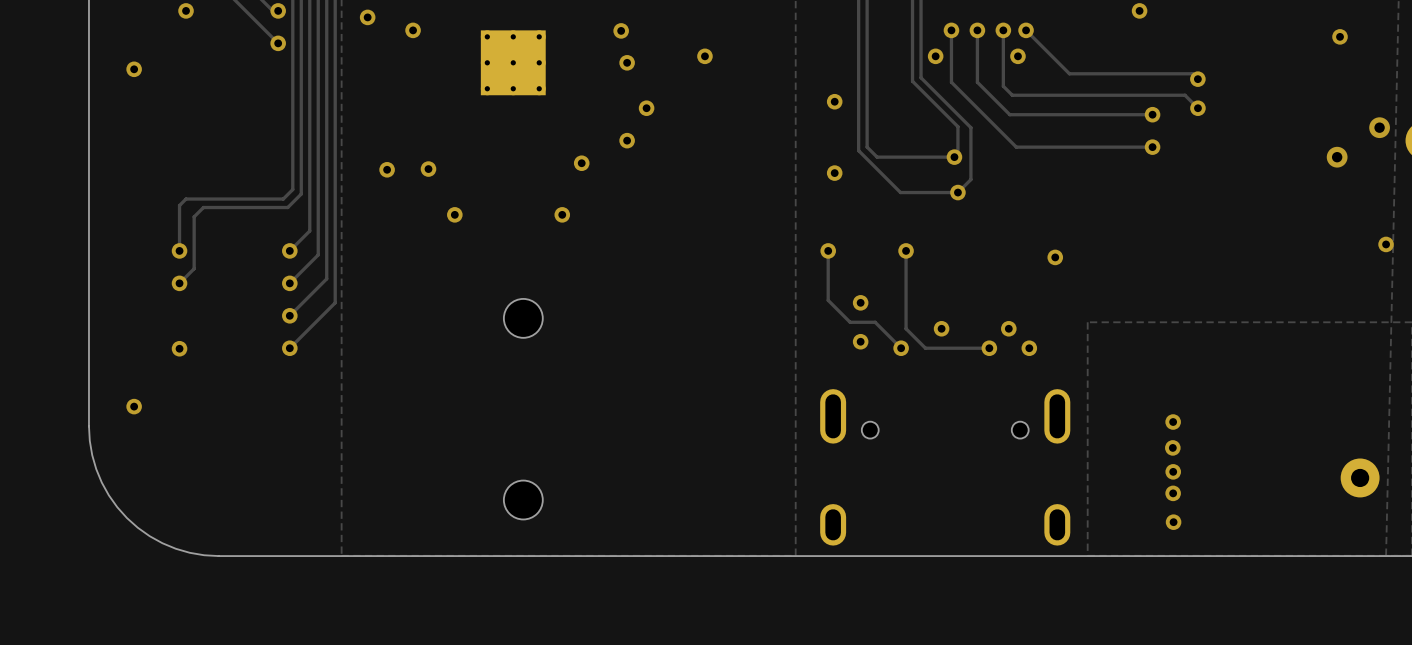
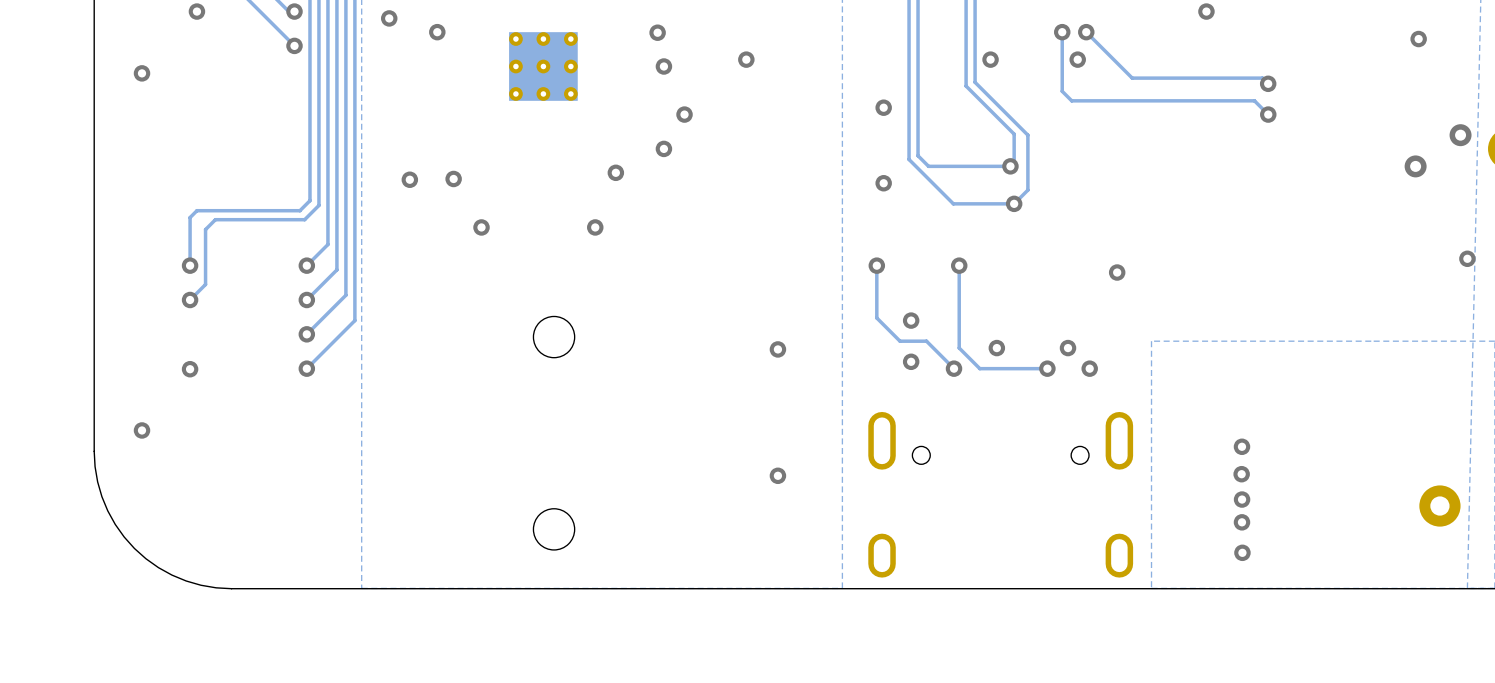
track: (951, 30) (951, 82) (1016, 147) (1152, 147) -> none
via: (951, 30) -> none
track: (977, 30) (977, 82) (1009, 114) (1152, 114) -> none
via: (977, 30) -> none
via: (1152, 114) -> none
via: (1152, 147) -> none
via: none -> (777, 349)
via: none -> (777, 475)

